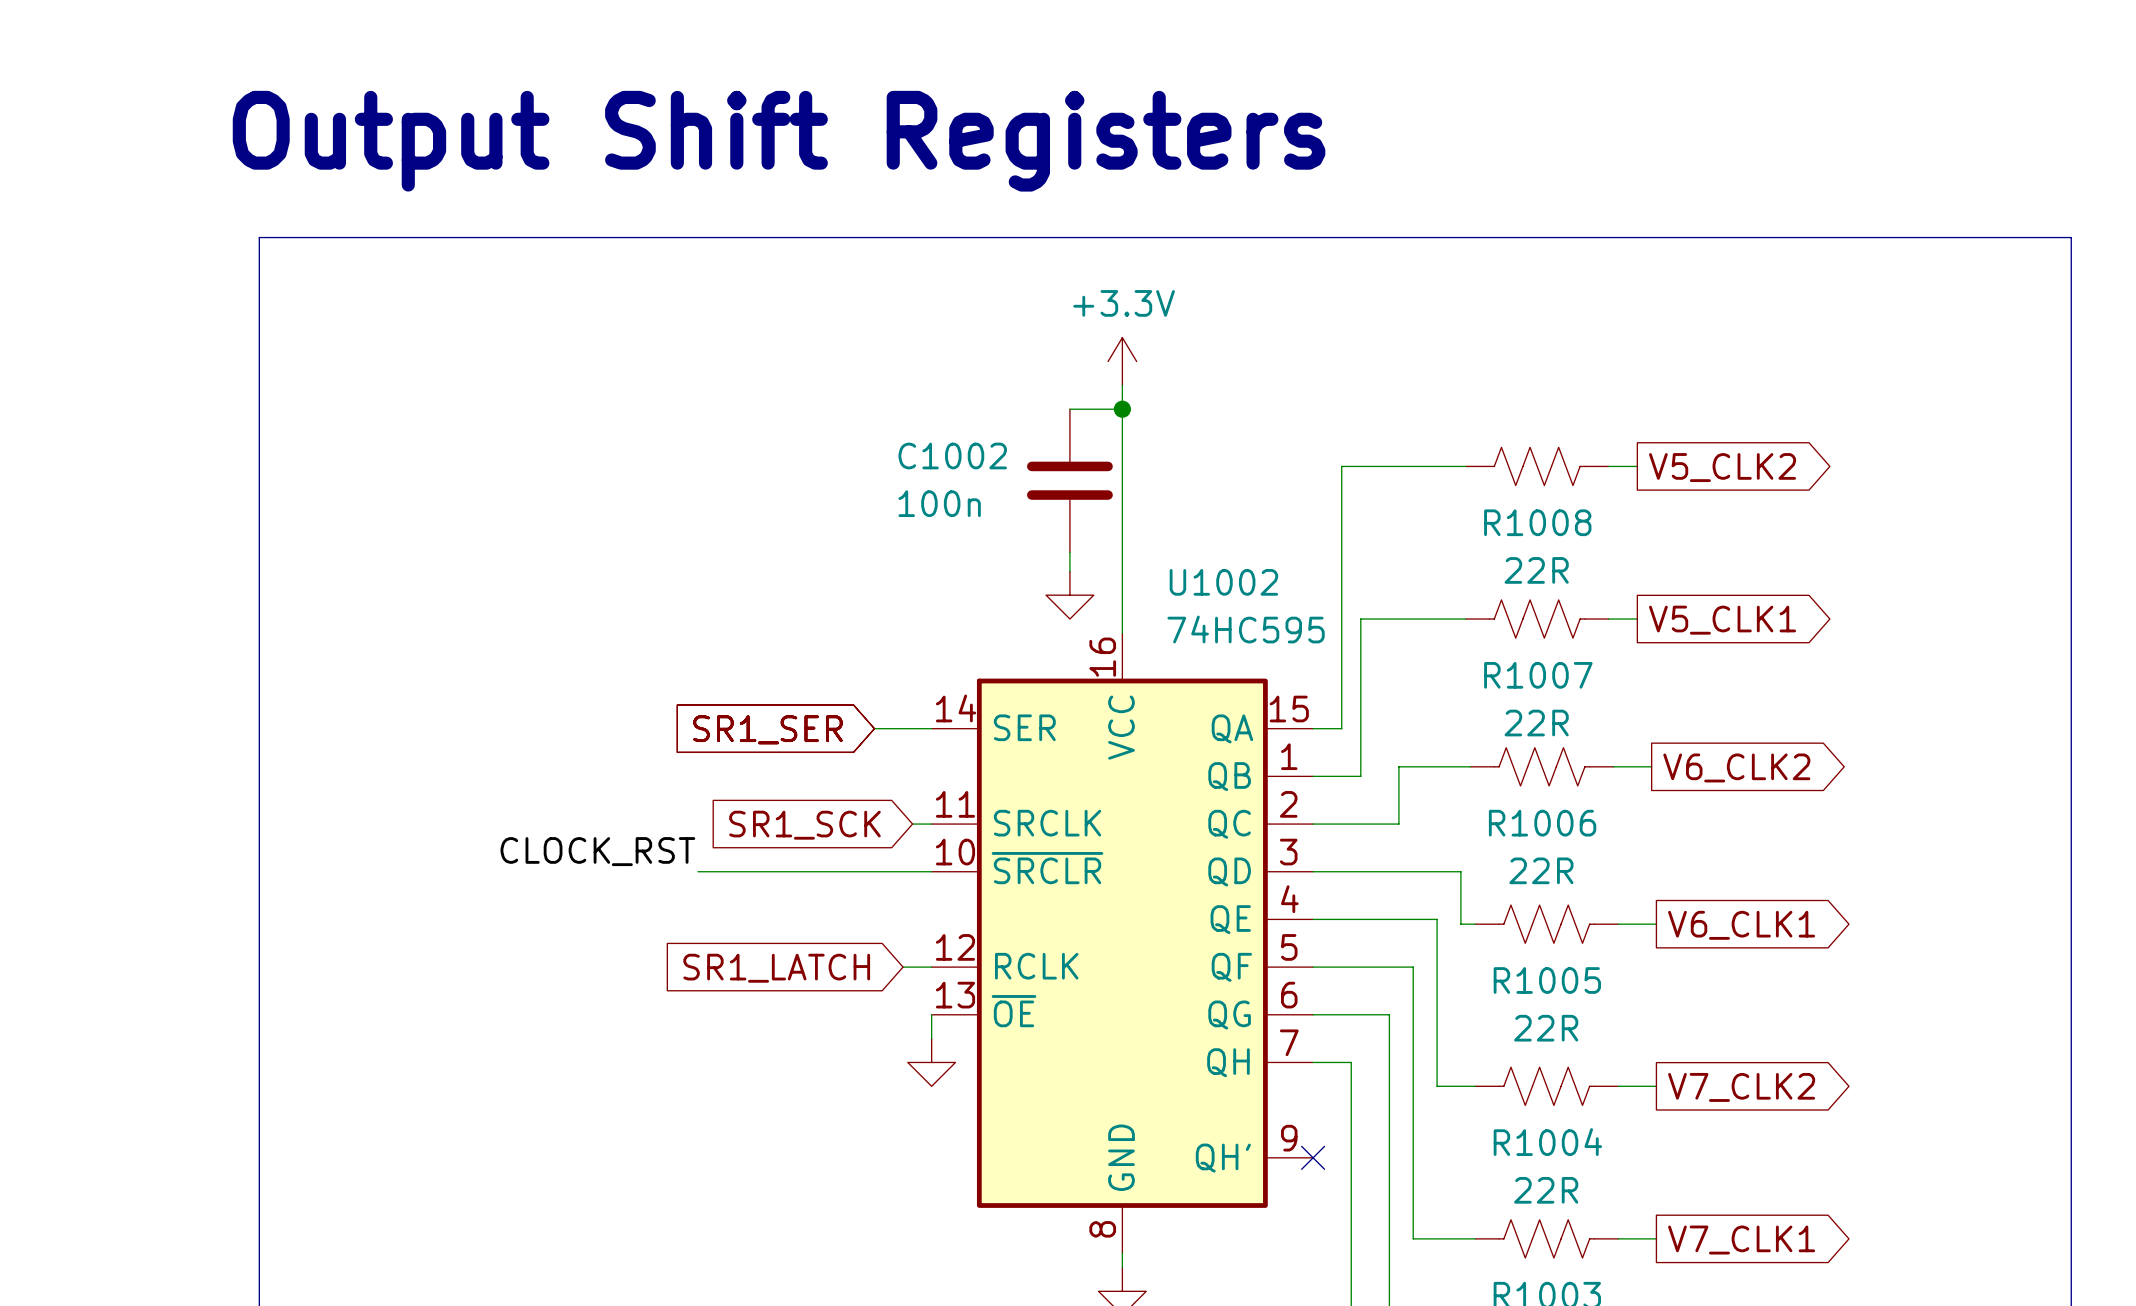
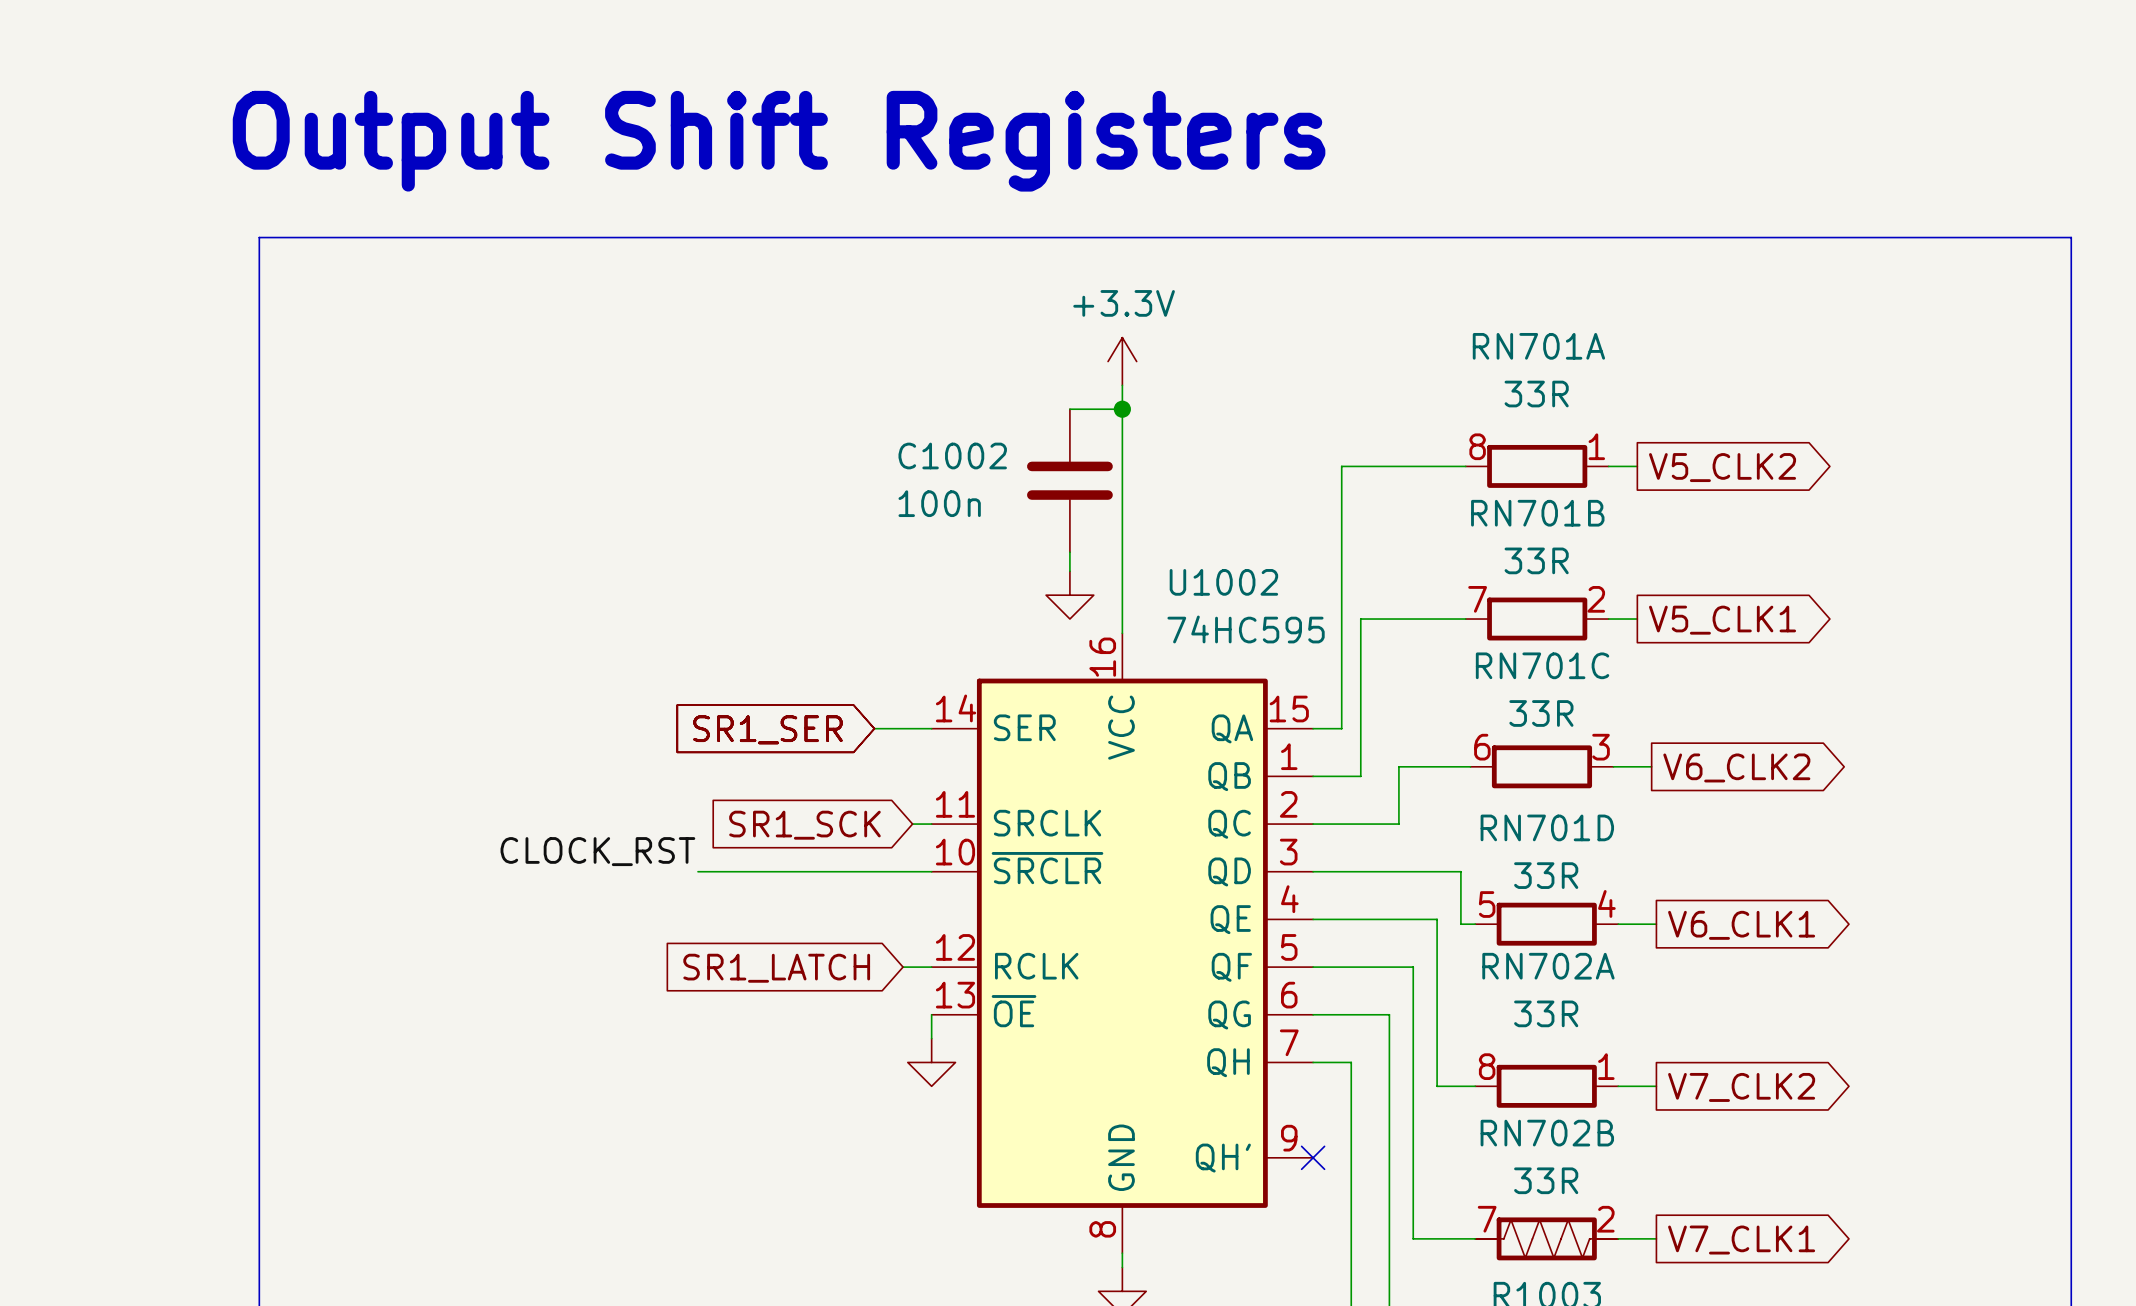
R1008: 22R (1537, 466) -> none
RN701A: none -> 33R (1537, 466)
R1007: 22R (1537, 619) -> none
RN701B: none -> 33R (1537, 619)
R1006: 22R (1541, 766) -> none
RN701C: none -> 33R (1541, 766)
R1005: 22R (1546, 924) -> none
RN701D: none -> 33R (1546, 924)
R1004: 22R (1546, 1086) -> none
RN702A: none -> 33R (1546, 1086)
RN702B: none -> 33R (1546, 1238)

